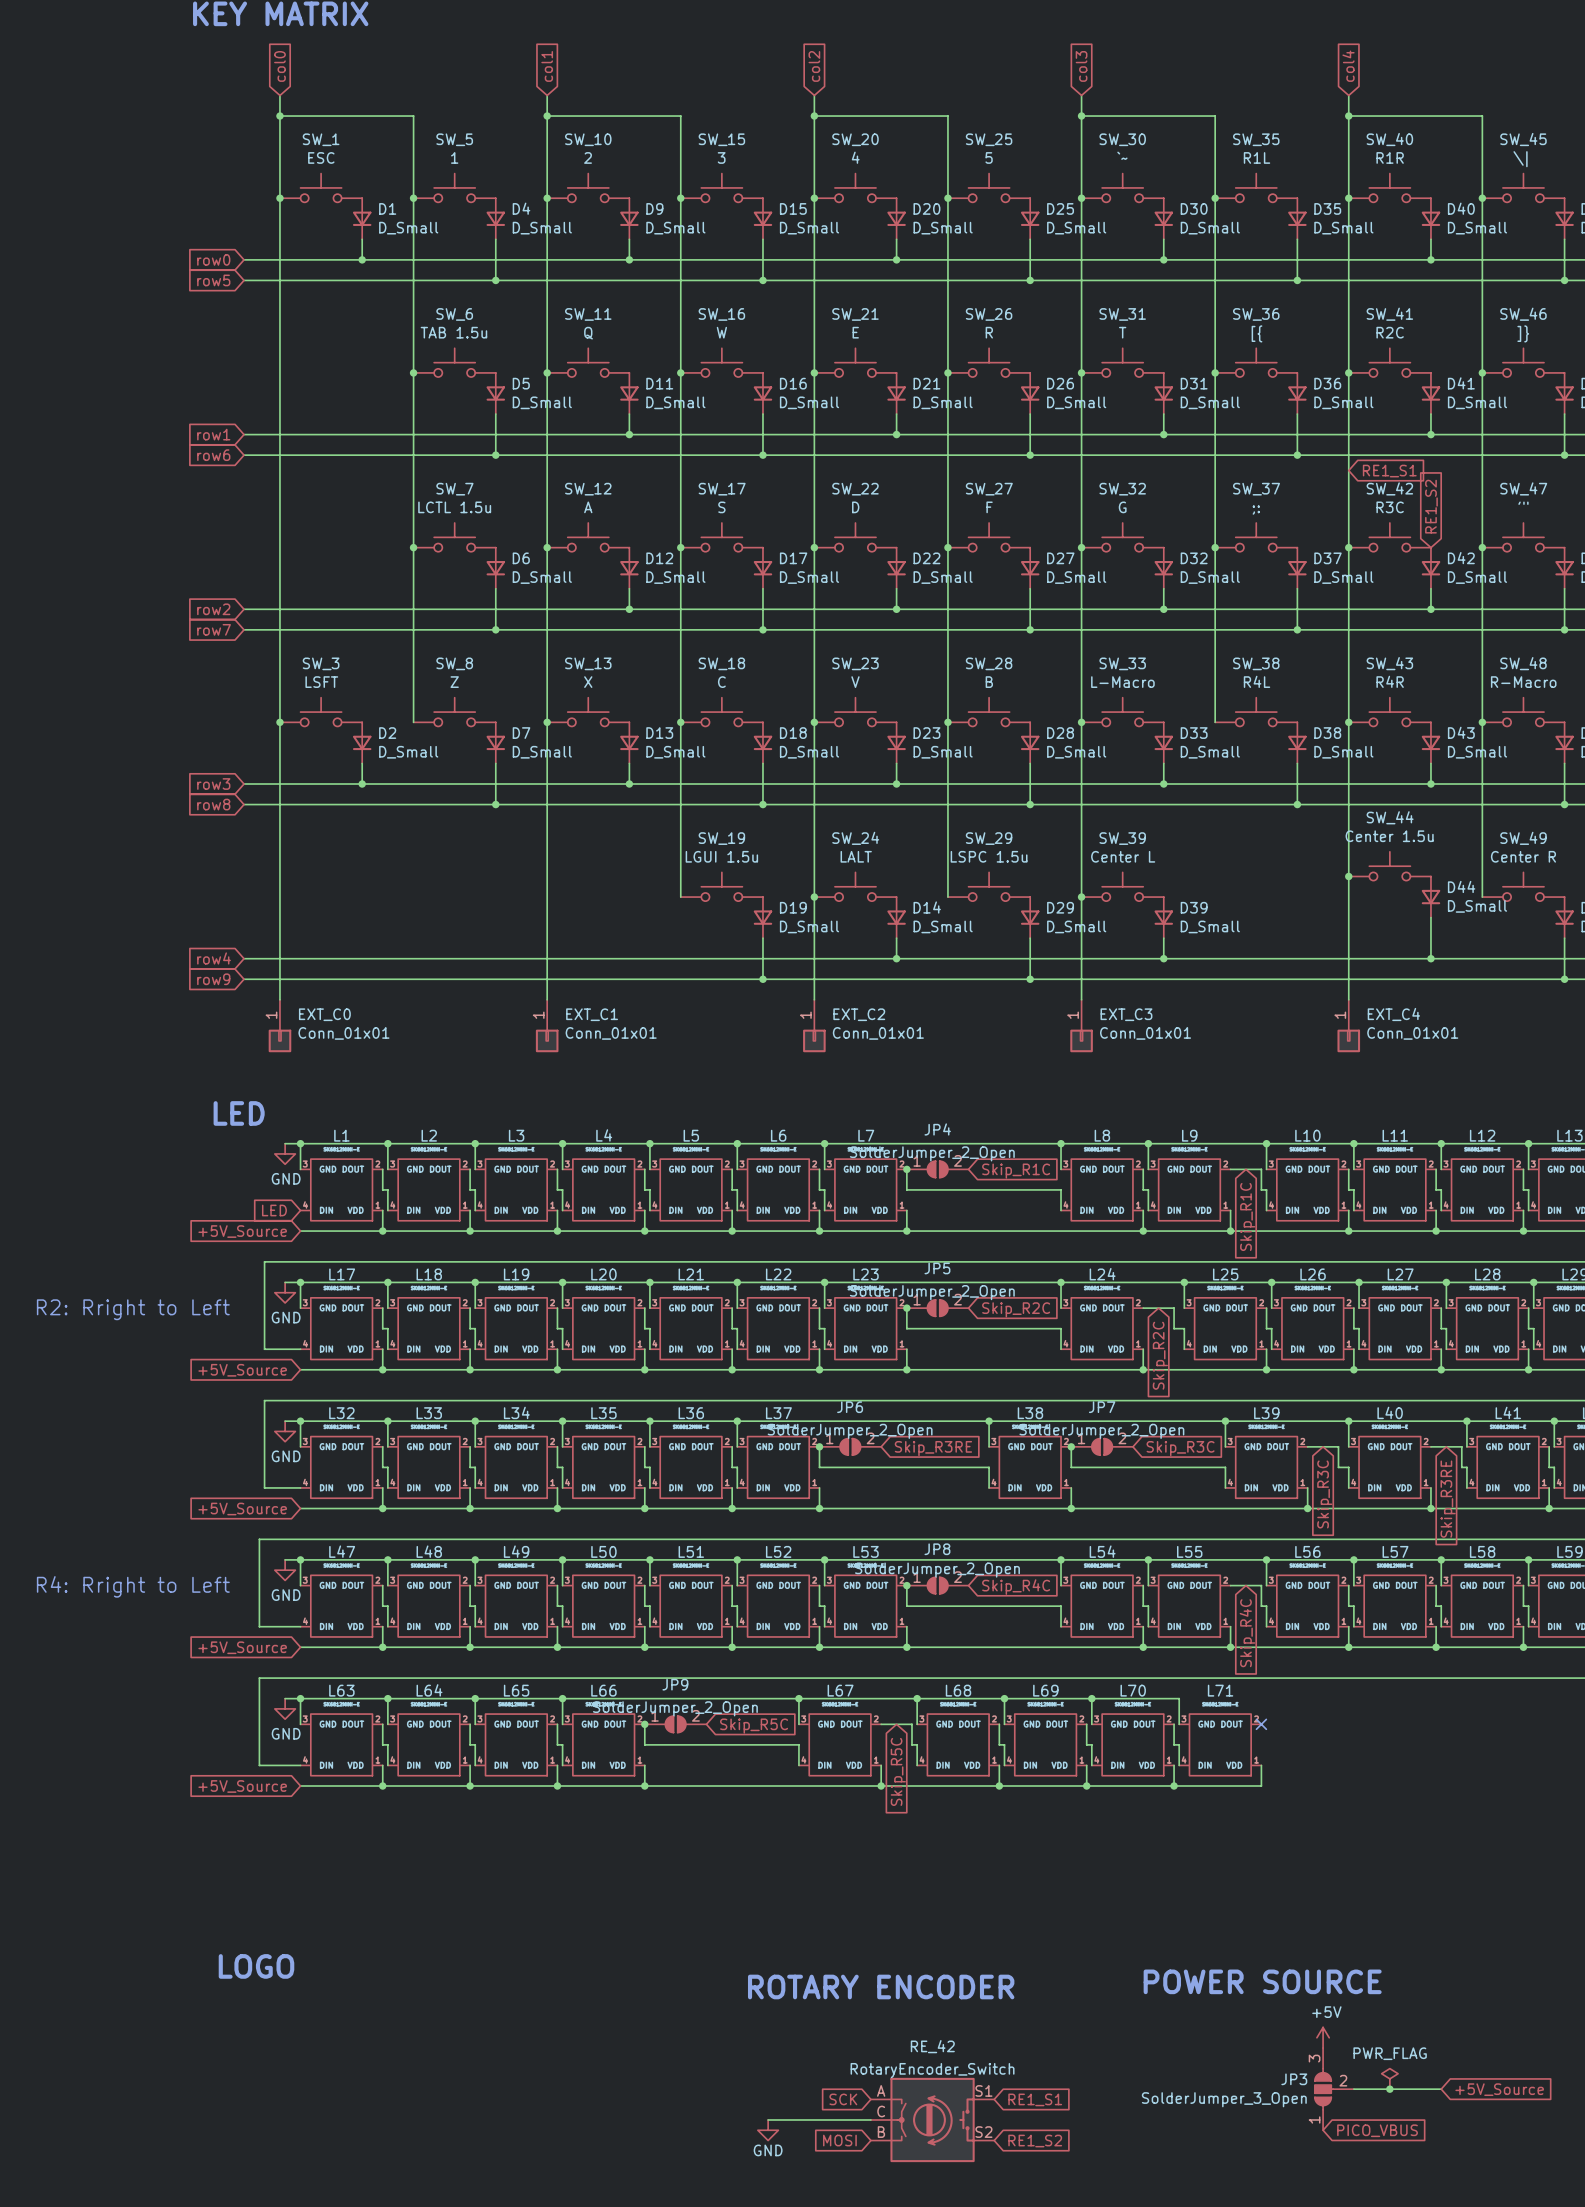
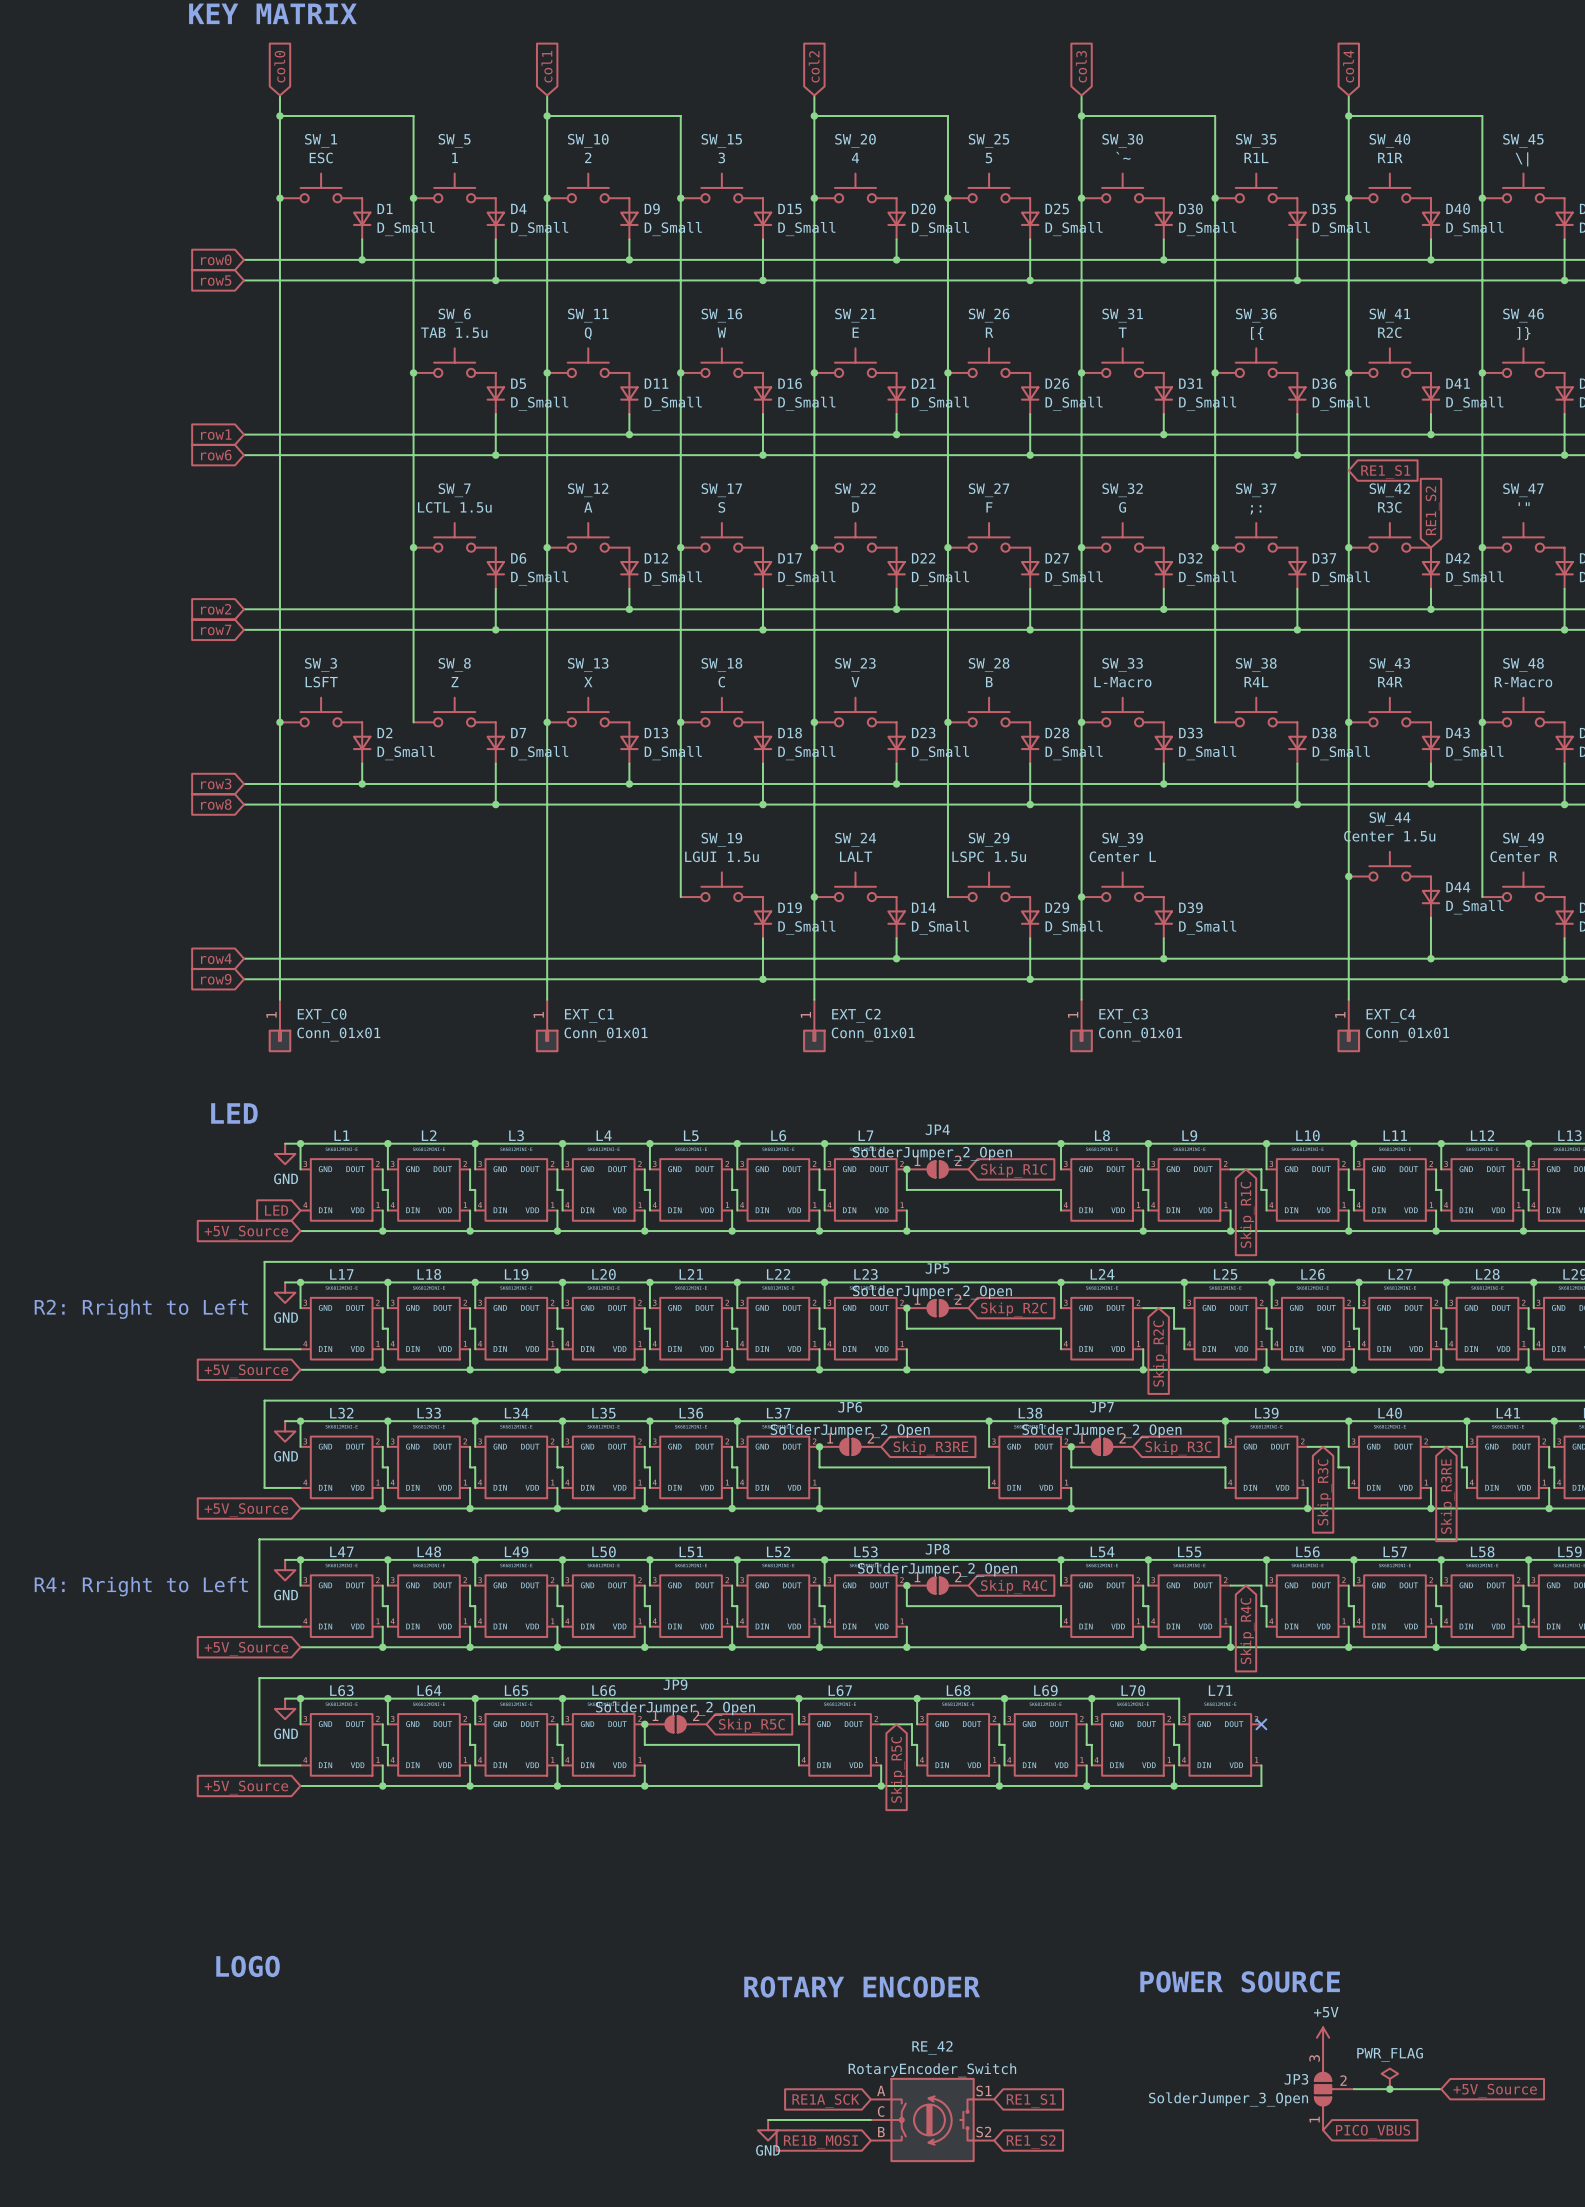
global label: SCK (843, 2099) -> RE1A_SCK (825, 2101)
global label: MOSI (839, 2140) -> RE1B_MOSI (820, 2142)

